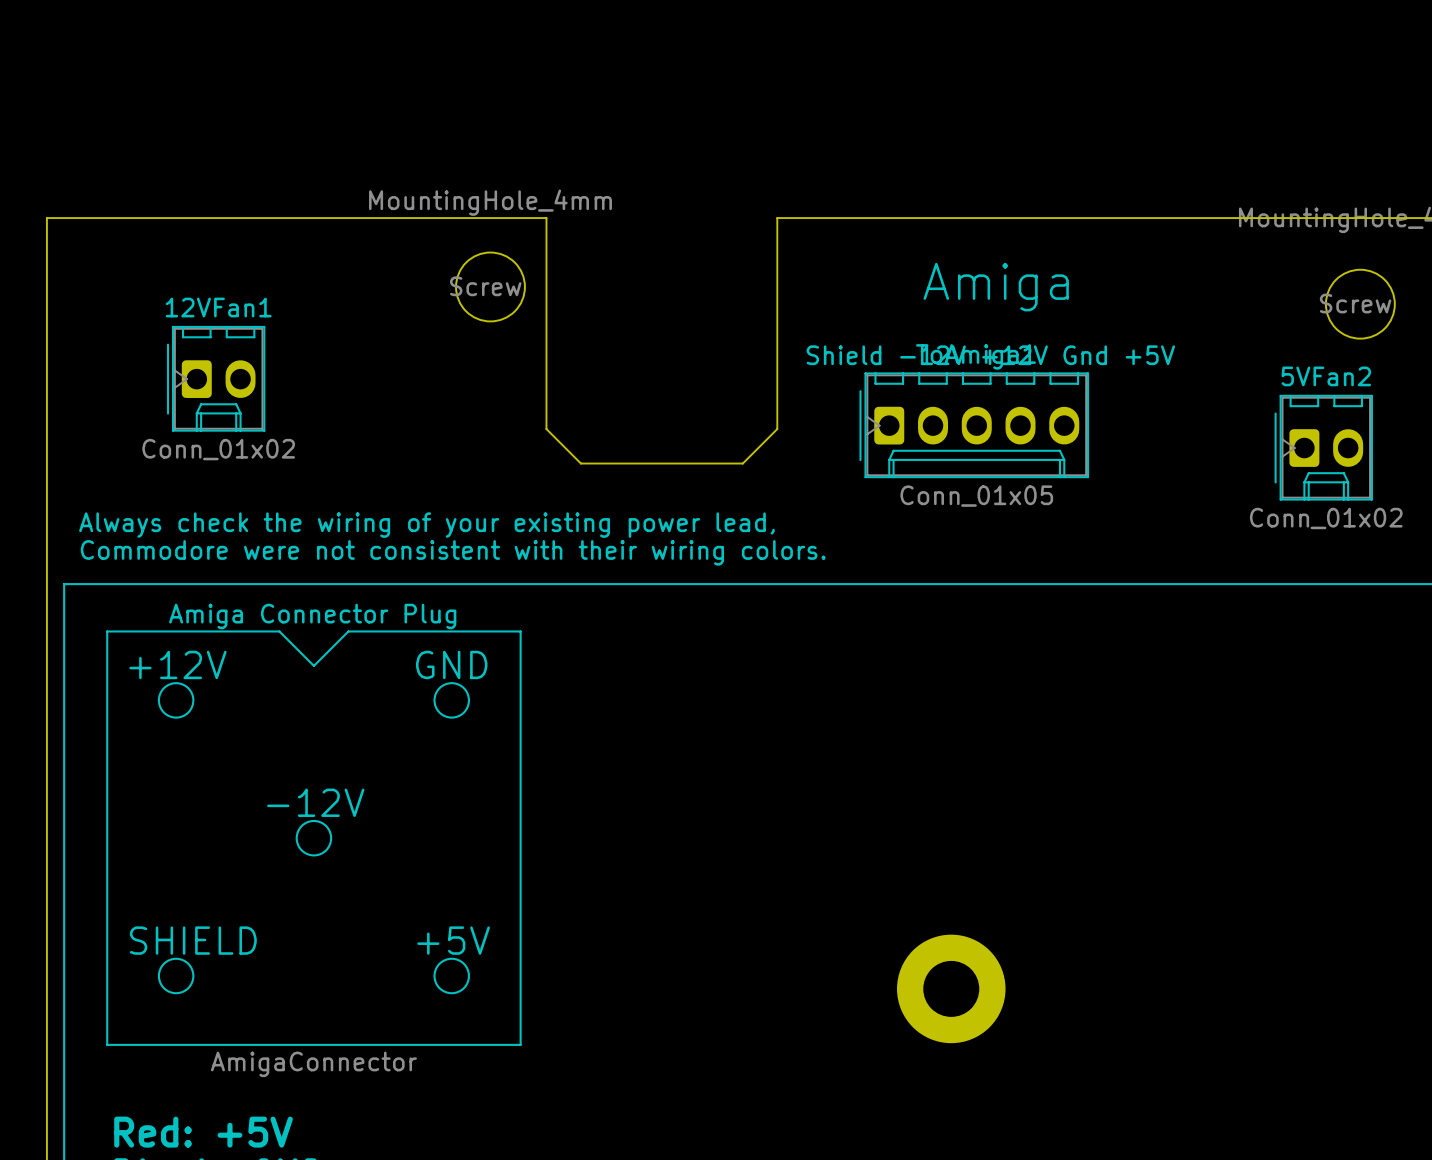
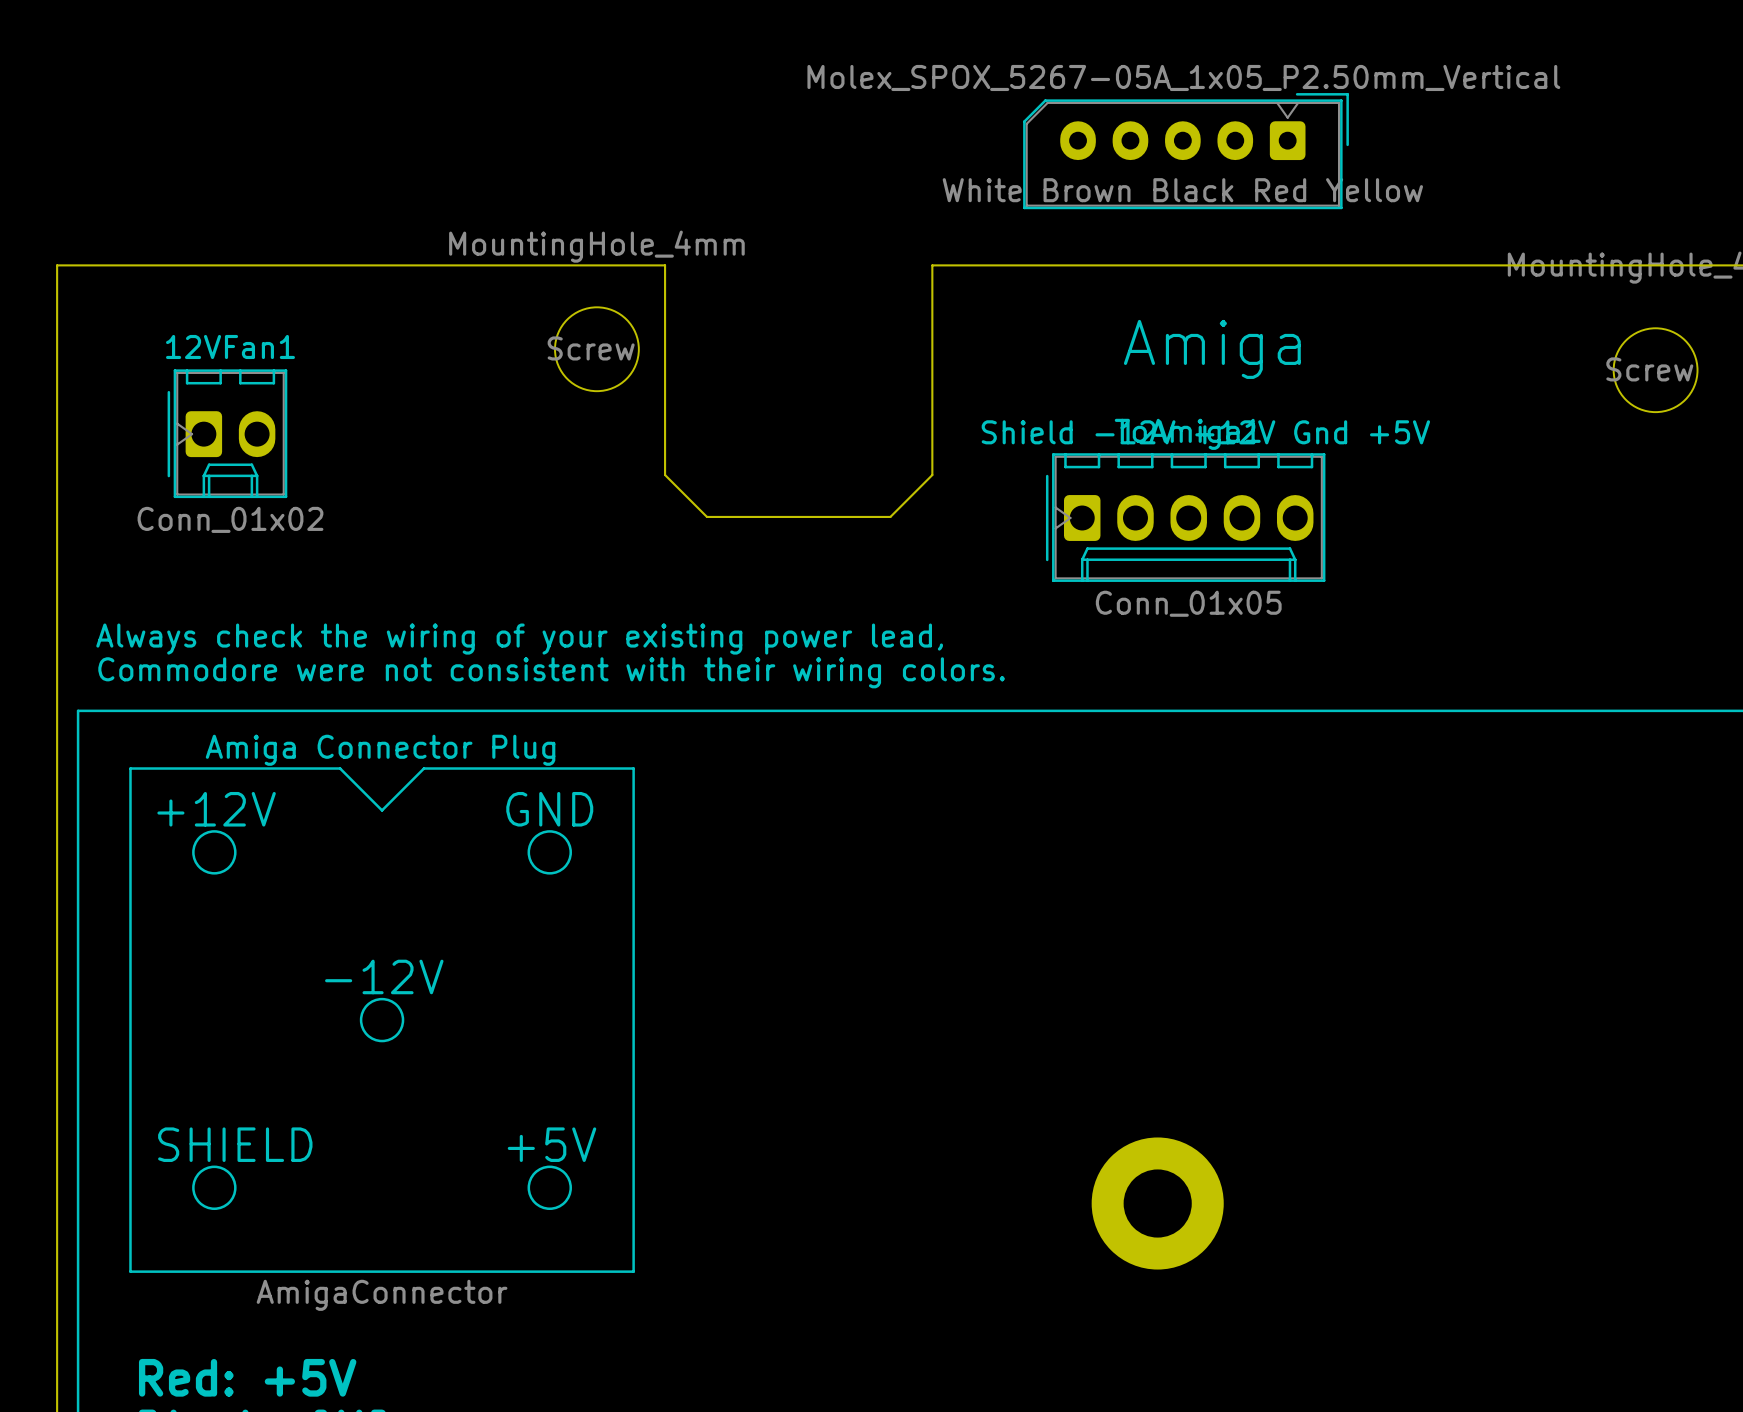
White Brown Black Red Yellow: none -> Molex_SPOX_5267-05A_1x05_P2.50mm_Vertical (1186, 151)
board edge: (777, 218) (777, 429) (742, 463) (580, 463) (546, 429) (546, 390) -> (945, 265) (932, 265) (932, 475) (890, 516) (706, 516) (665, 475)
12VFan1 position: (216, 378) -> (227, 433)
5VFan2: Conn_01x02 (1323, 447) -> none

